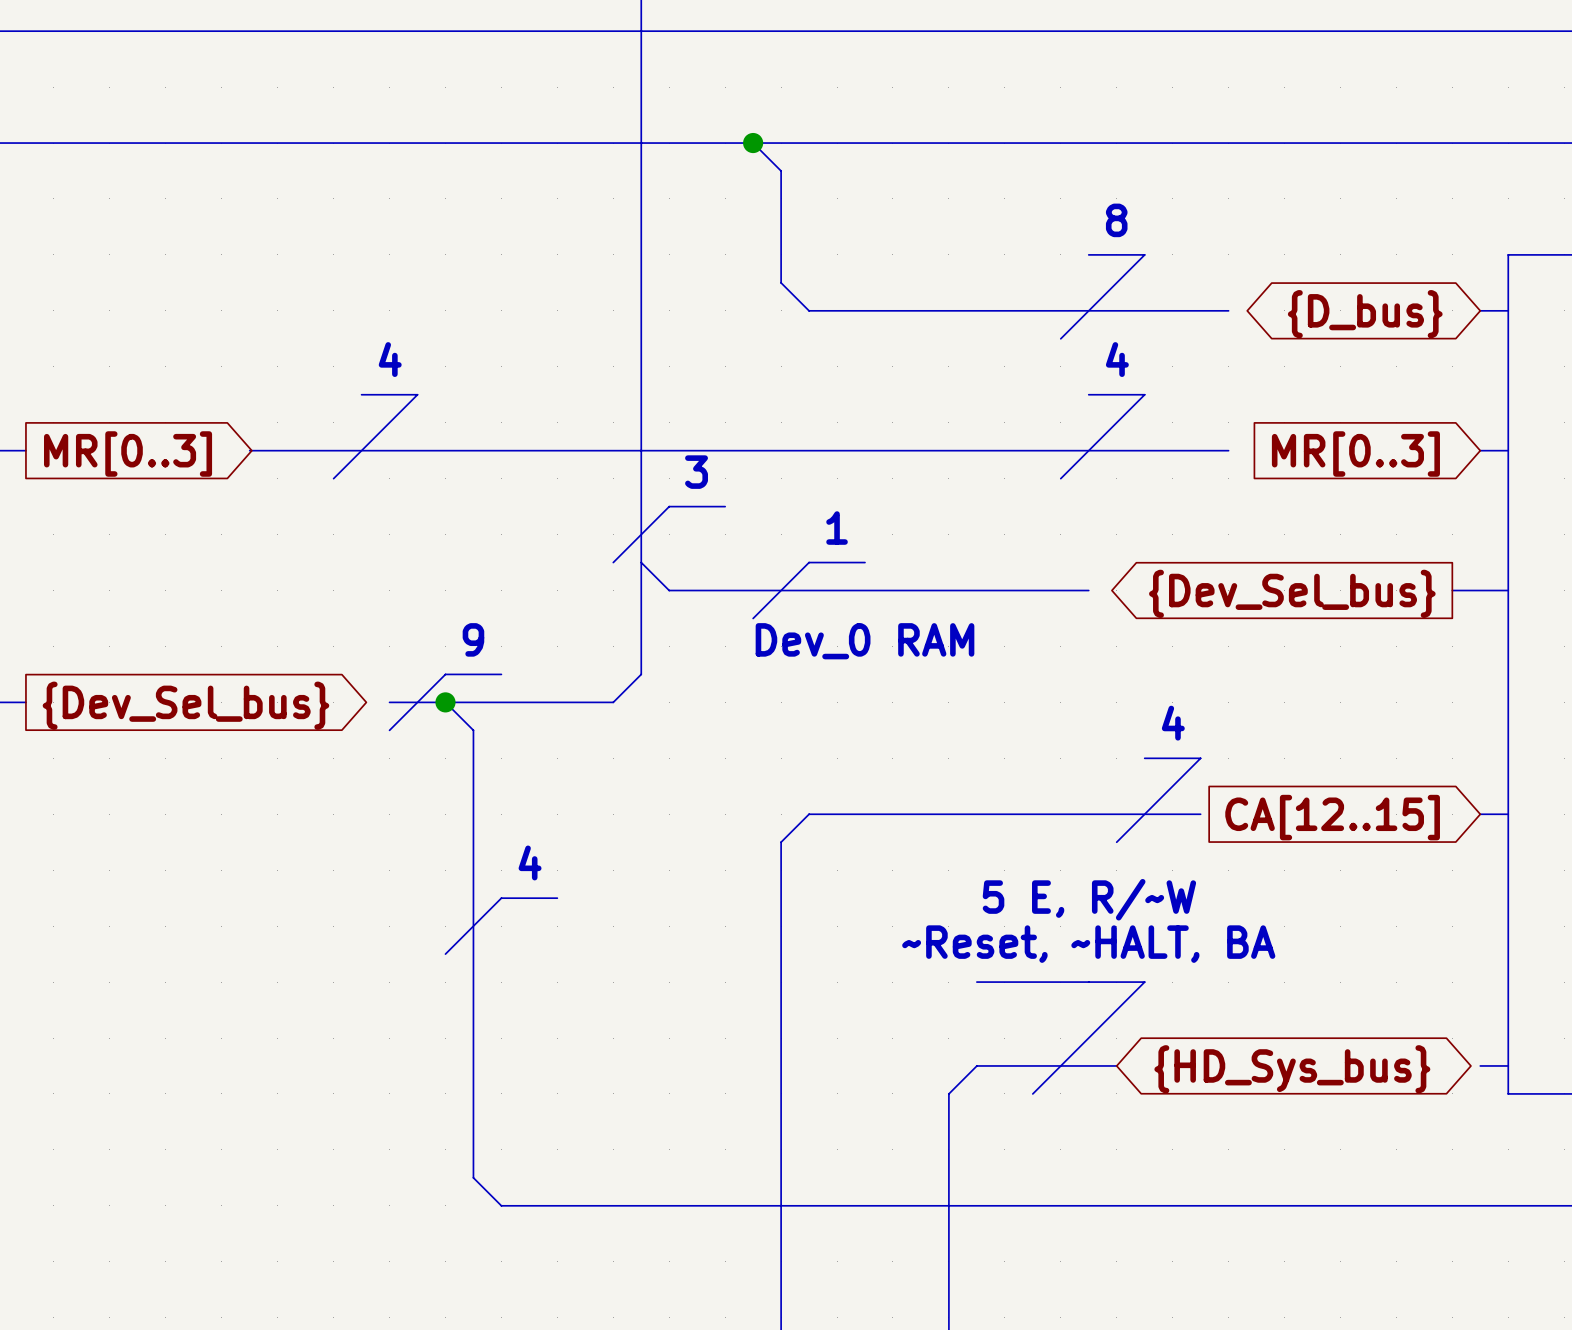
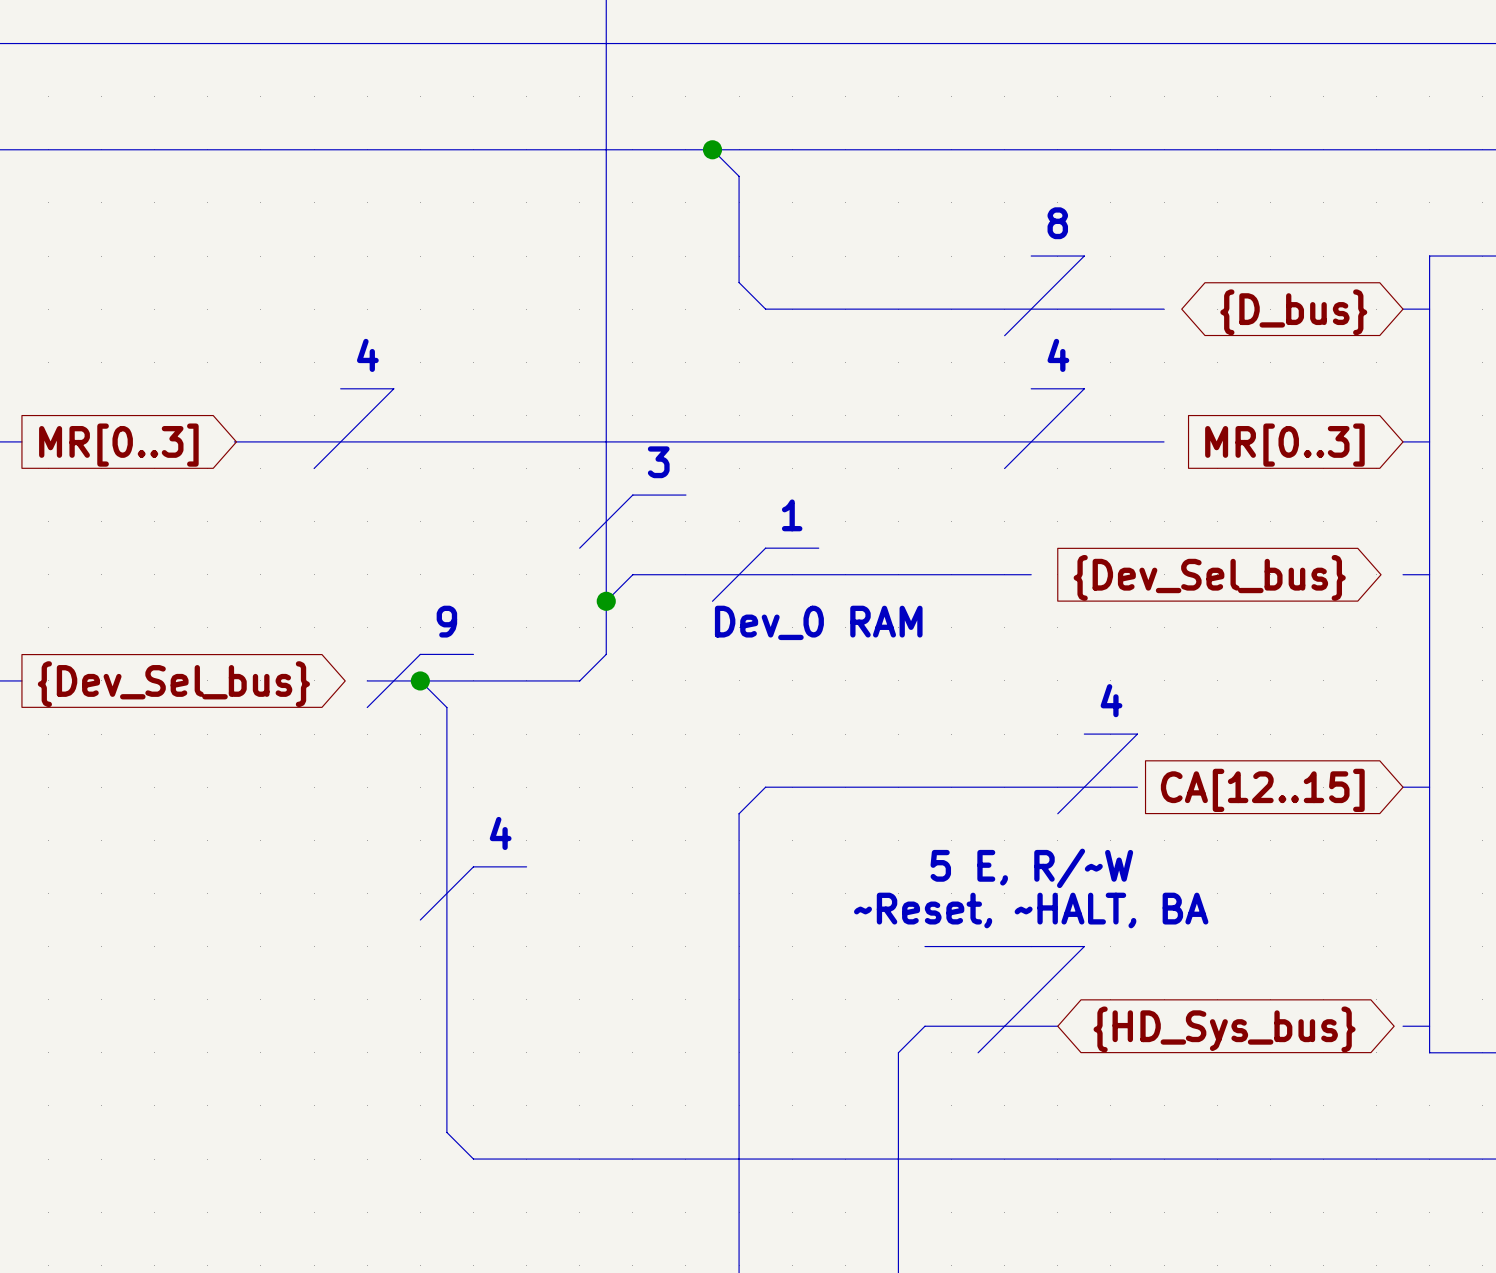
bus: (641, 562) (669, 590) -> (606, 601) (632, 574)
bus: (1452, 590) (1480, 590) -> none
global label rotation: 0° (1292, 593) -> 180° (1209, 577)
junction: none -> (606, 601)

